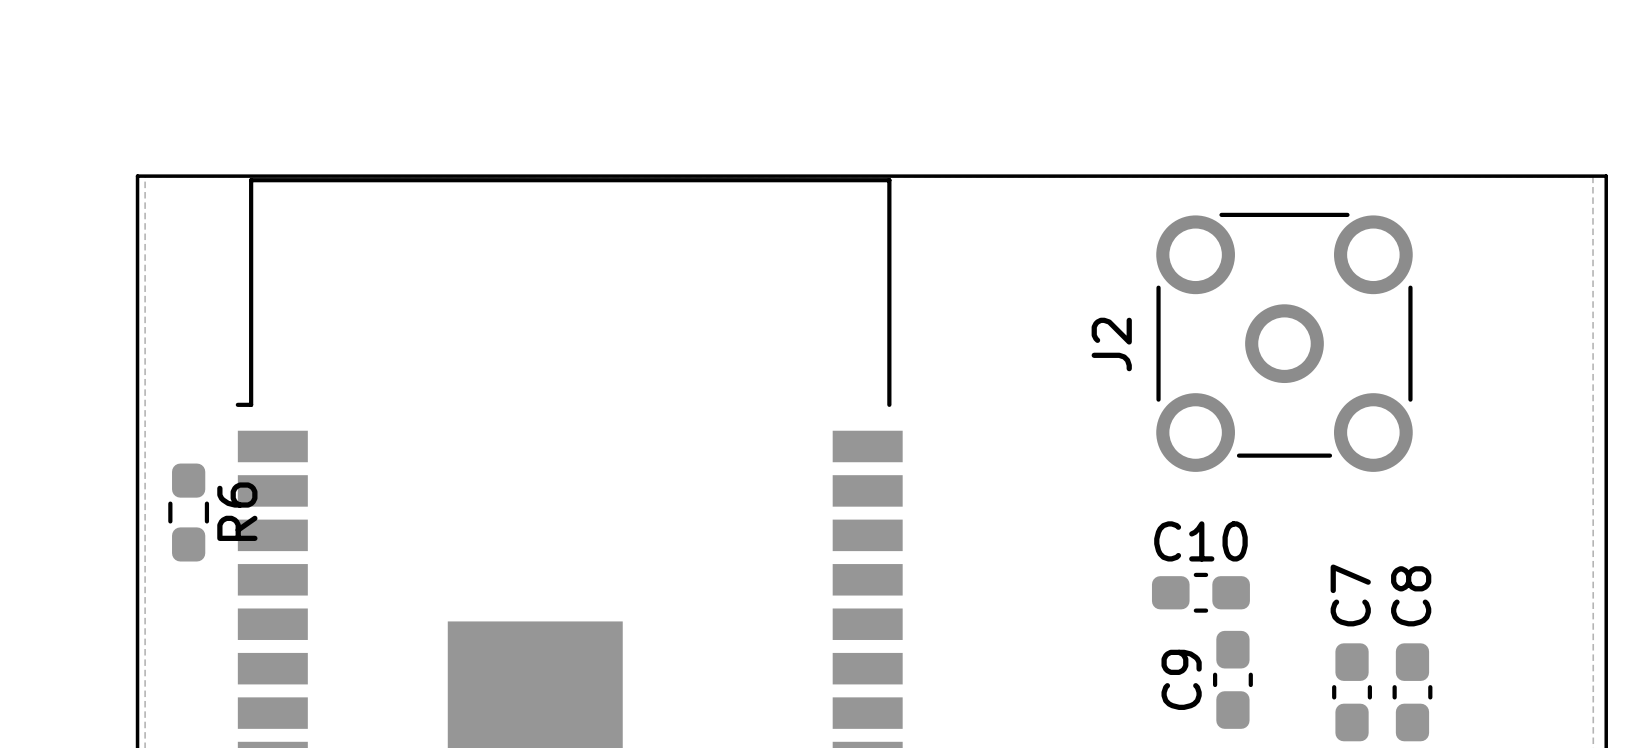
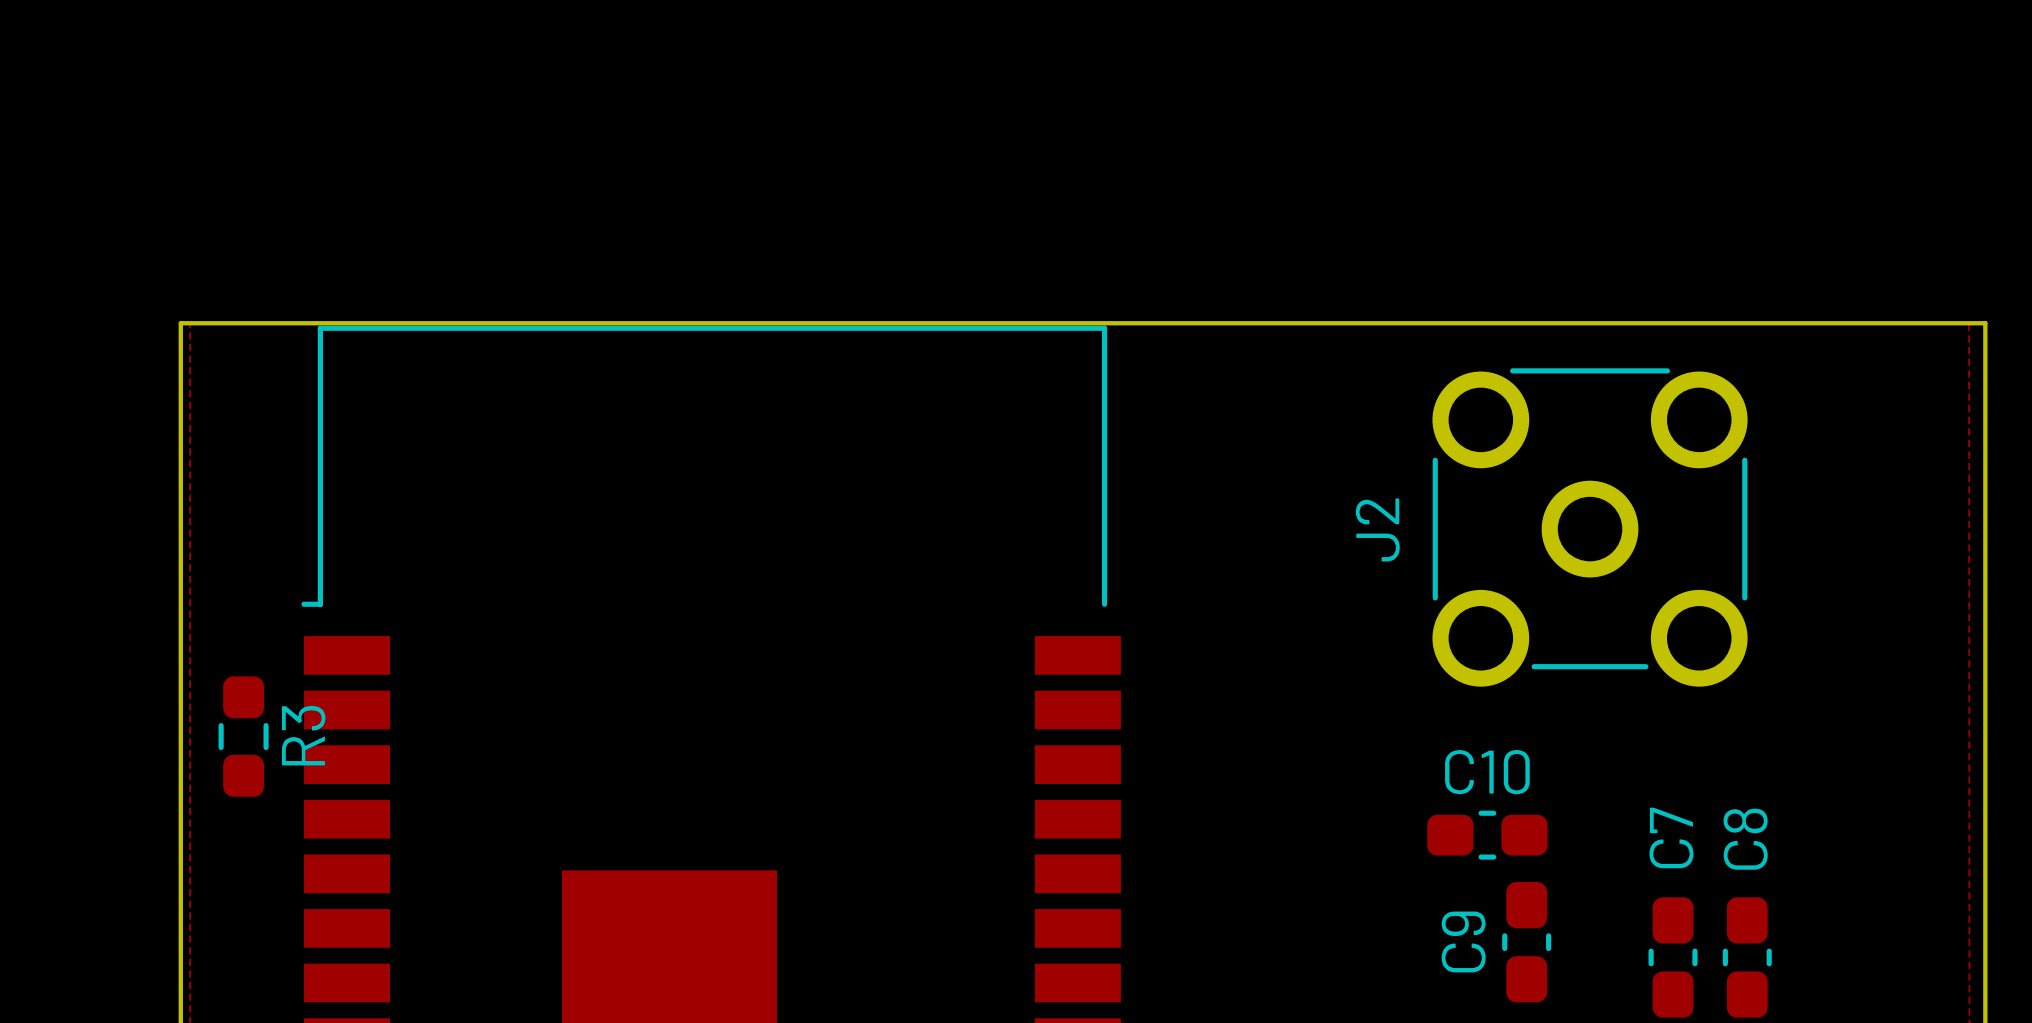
R6 name: R6 (237, 511) -> R3 (303, 735)

